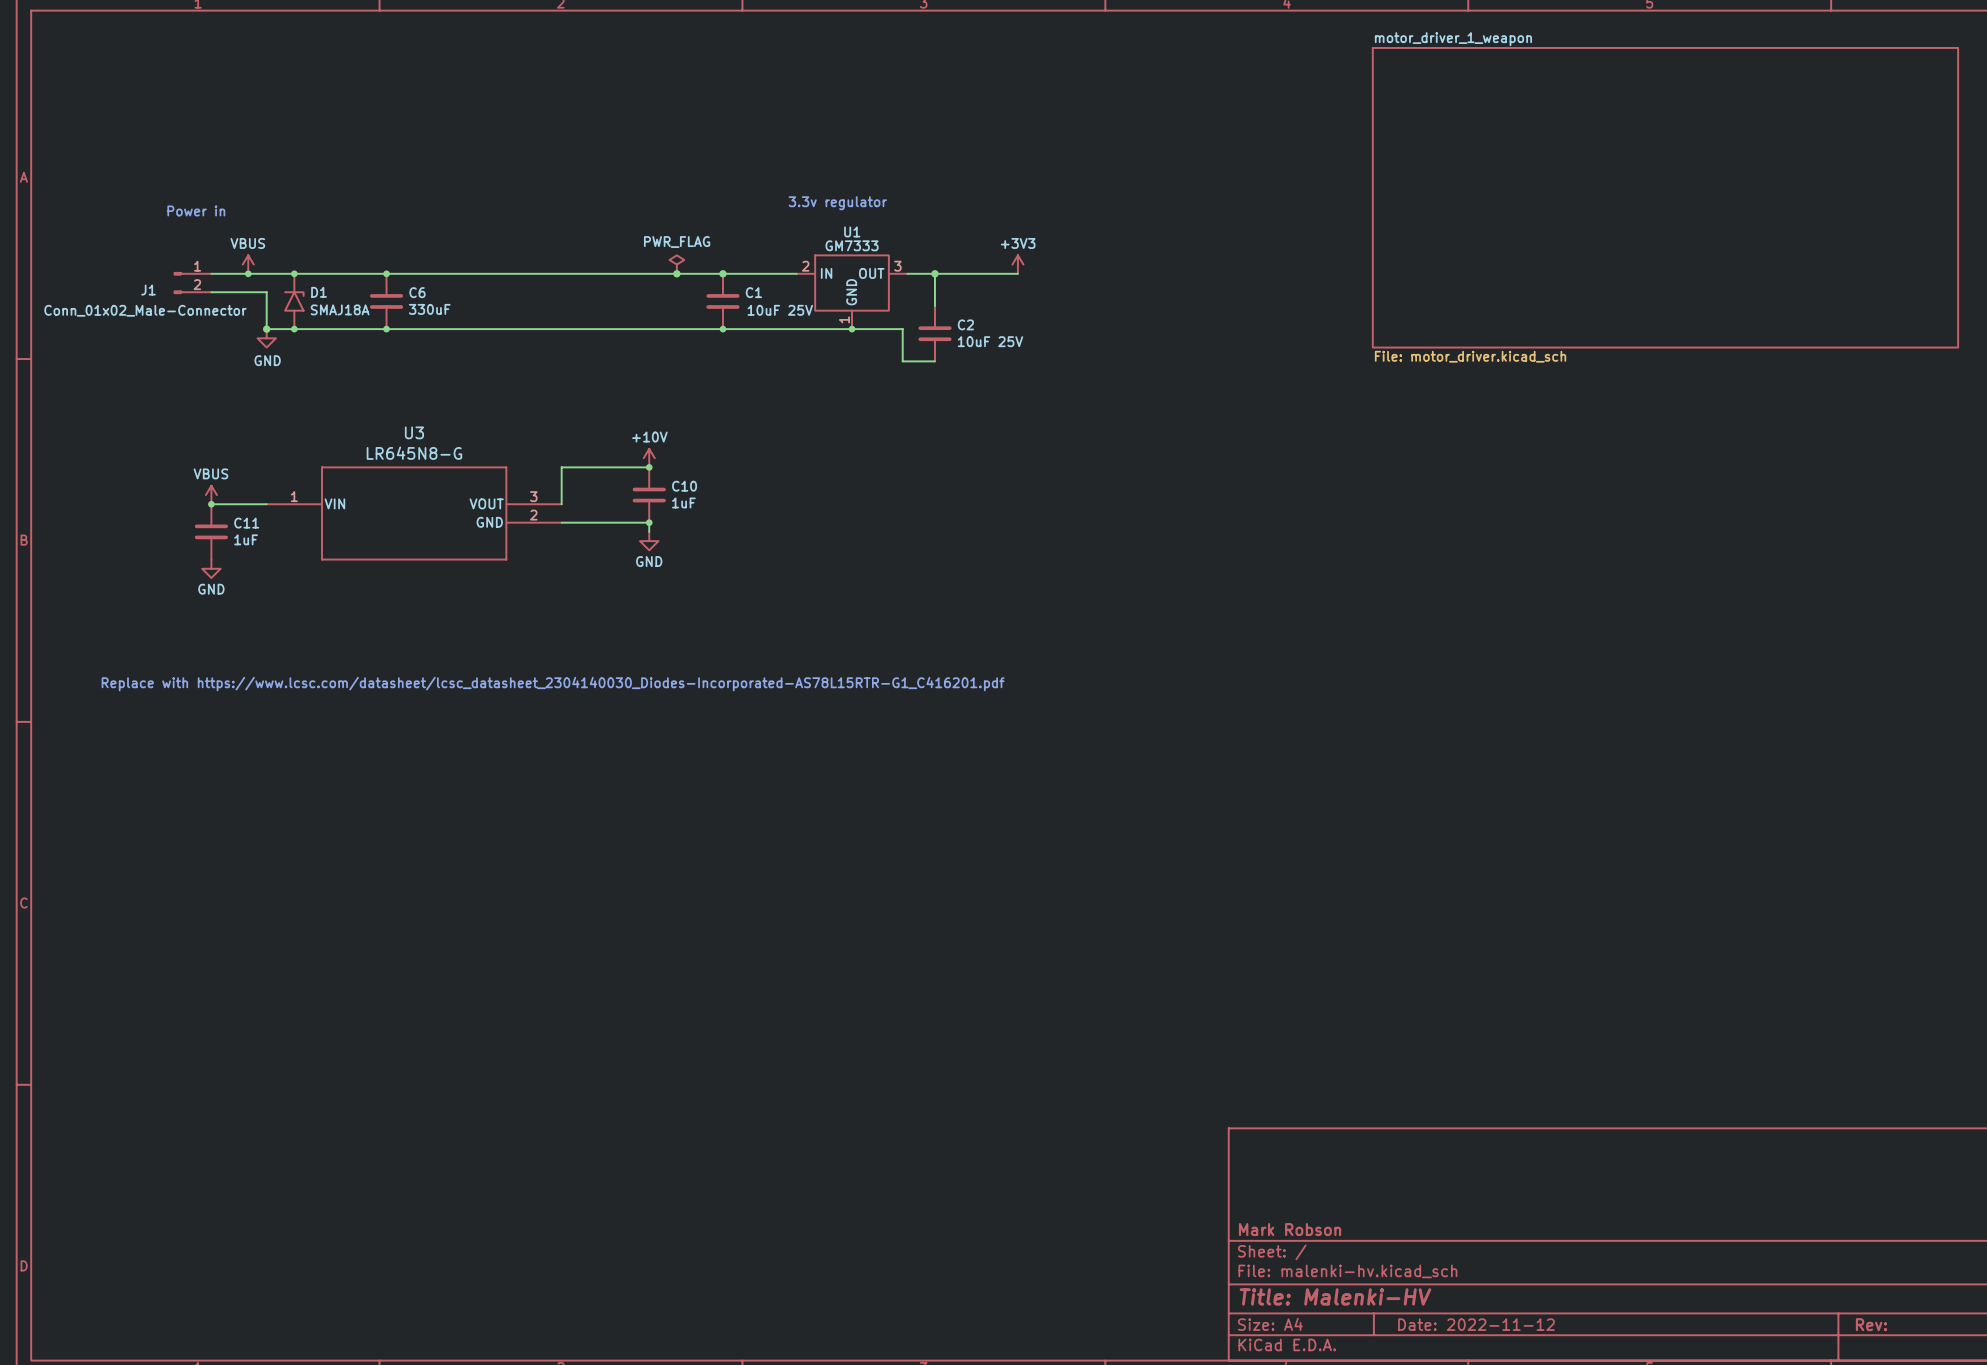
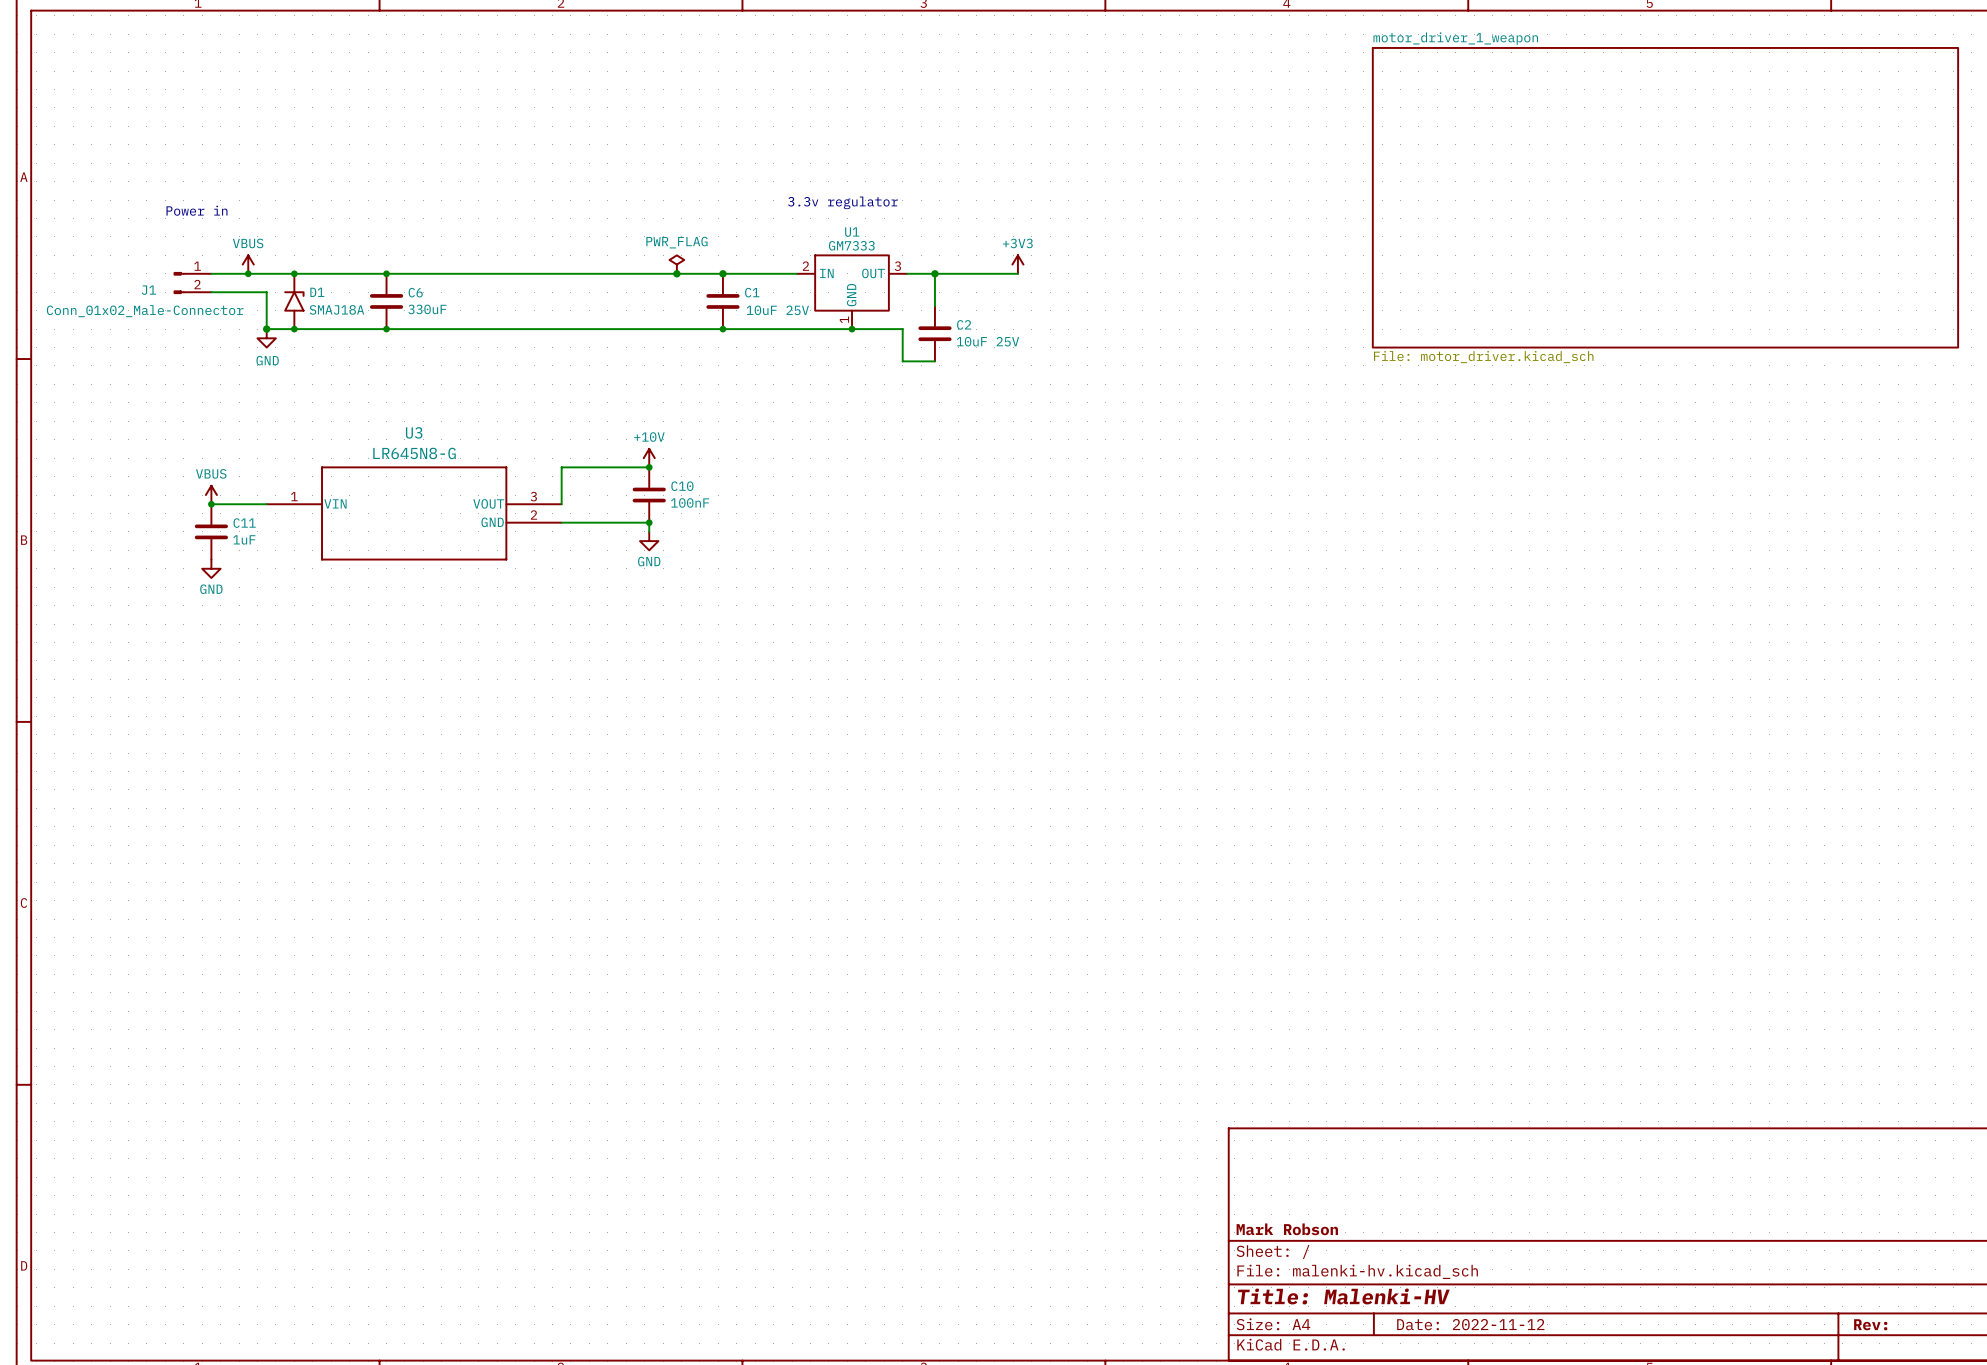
C10 value: 1uF (683, 502) -> 100nF (690, 502)
text: Replace with https://www.lcsc.com/datasheet/lcsc_datasheet_2304140030_Diodes-Incorporated-AS78L15RTR-G1_C416201.pdf (553, 684) -> none

